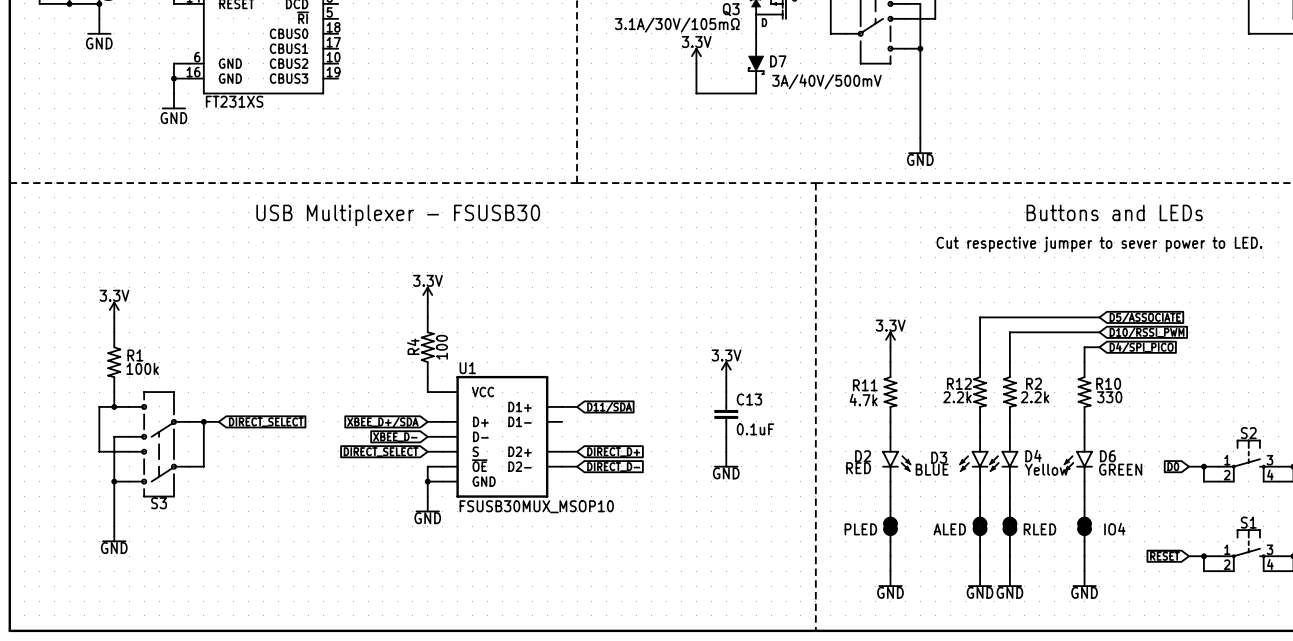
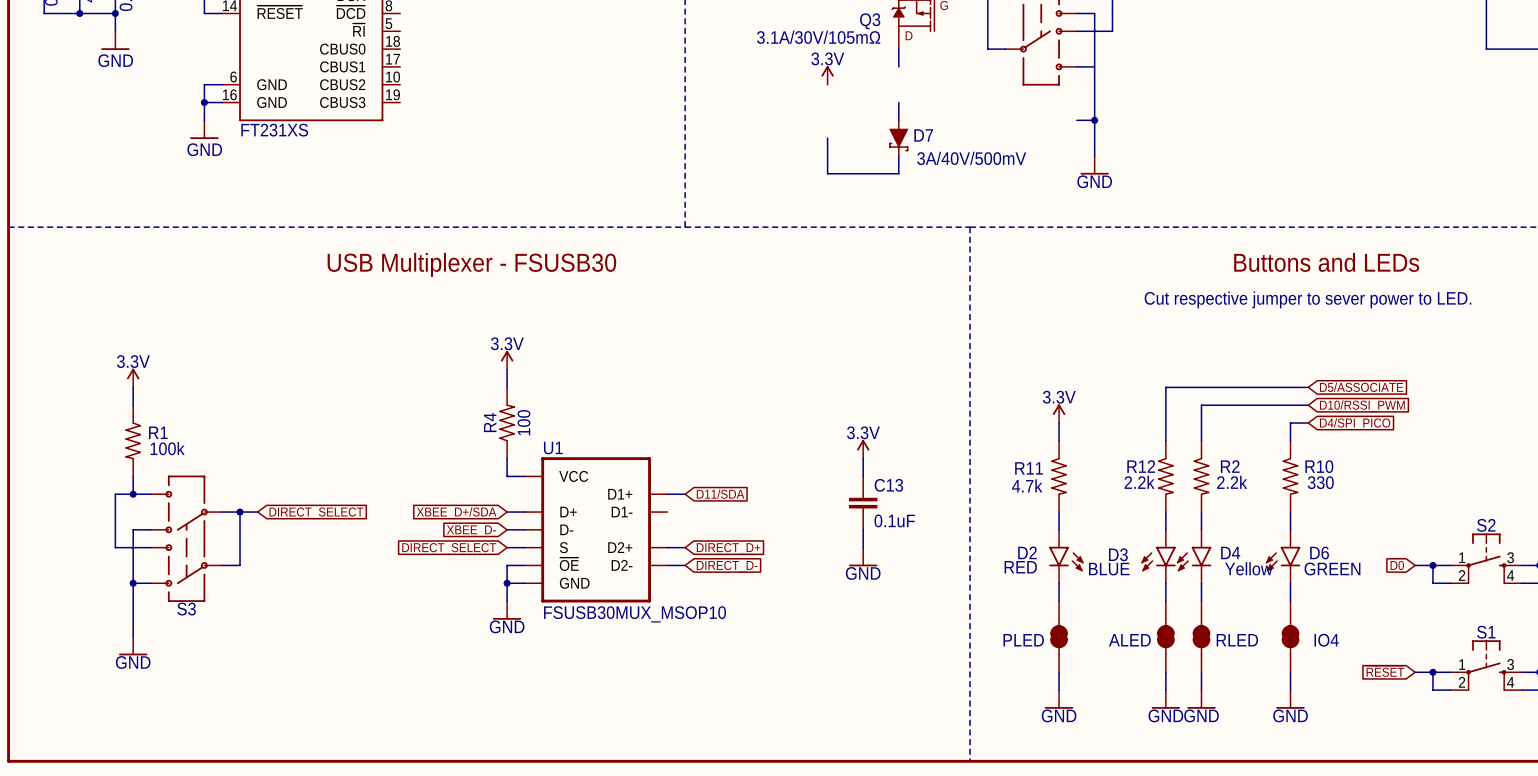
junction: (920, 48) -> none
wire: (696, 63) (696, 93) (756, 93) -> none
D7 position: (756, 63) -> (898, 138)
wire: none -> (1076, 120) (1094, 120)
junction: none -> (1094, 120)
wire: none -> (827, 138) (827, 173) (898, 173) (898, 155)
power symbol position: GND (920, 146) -> GND (1094, 165)

